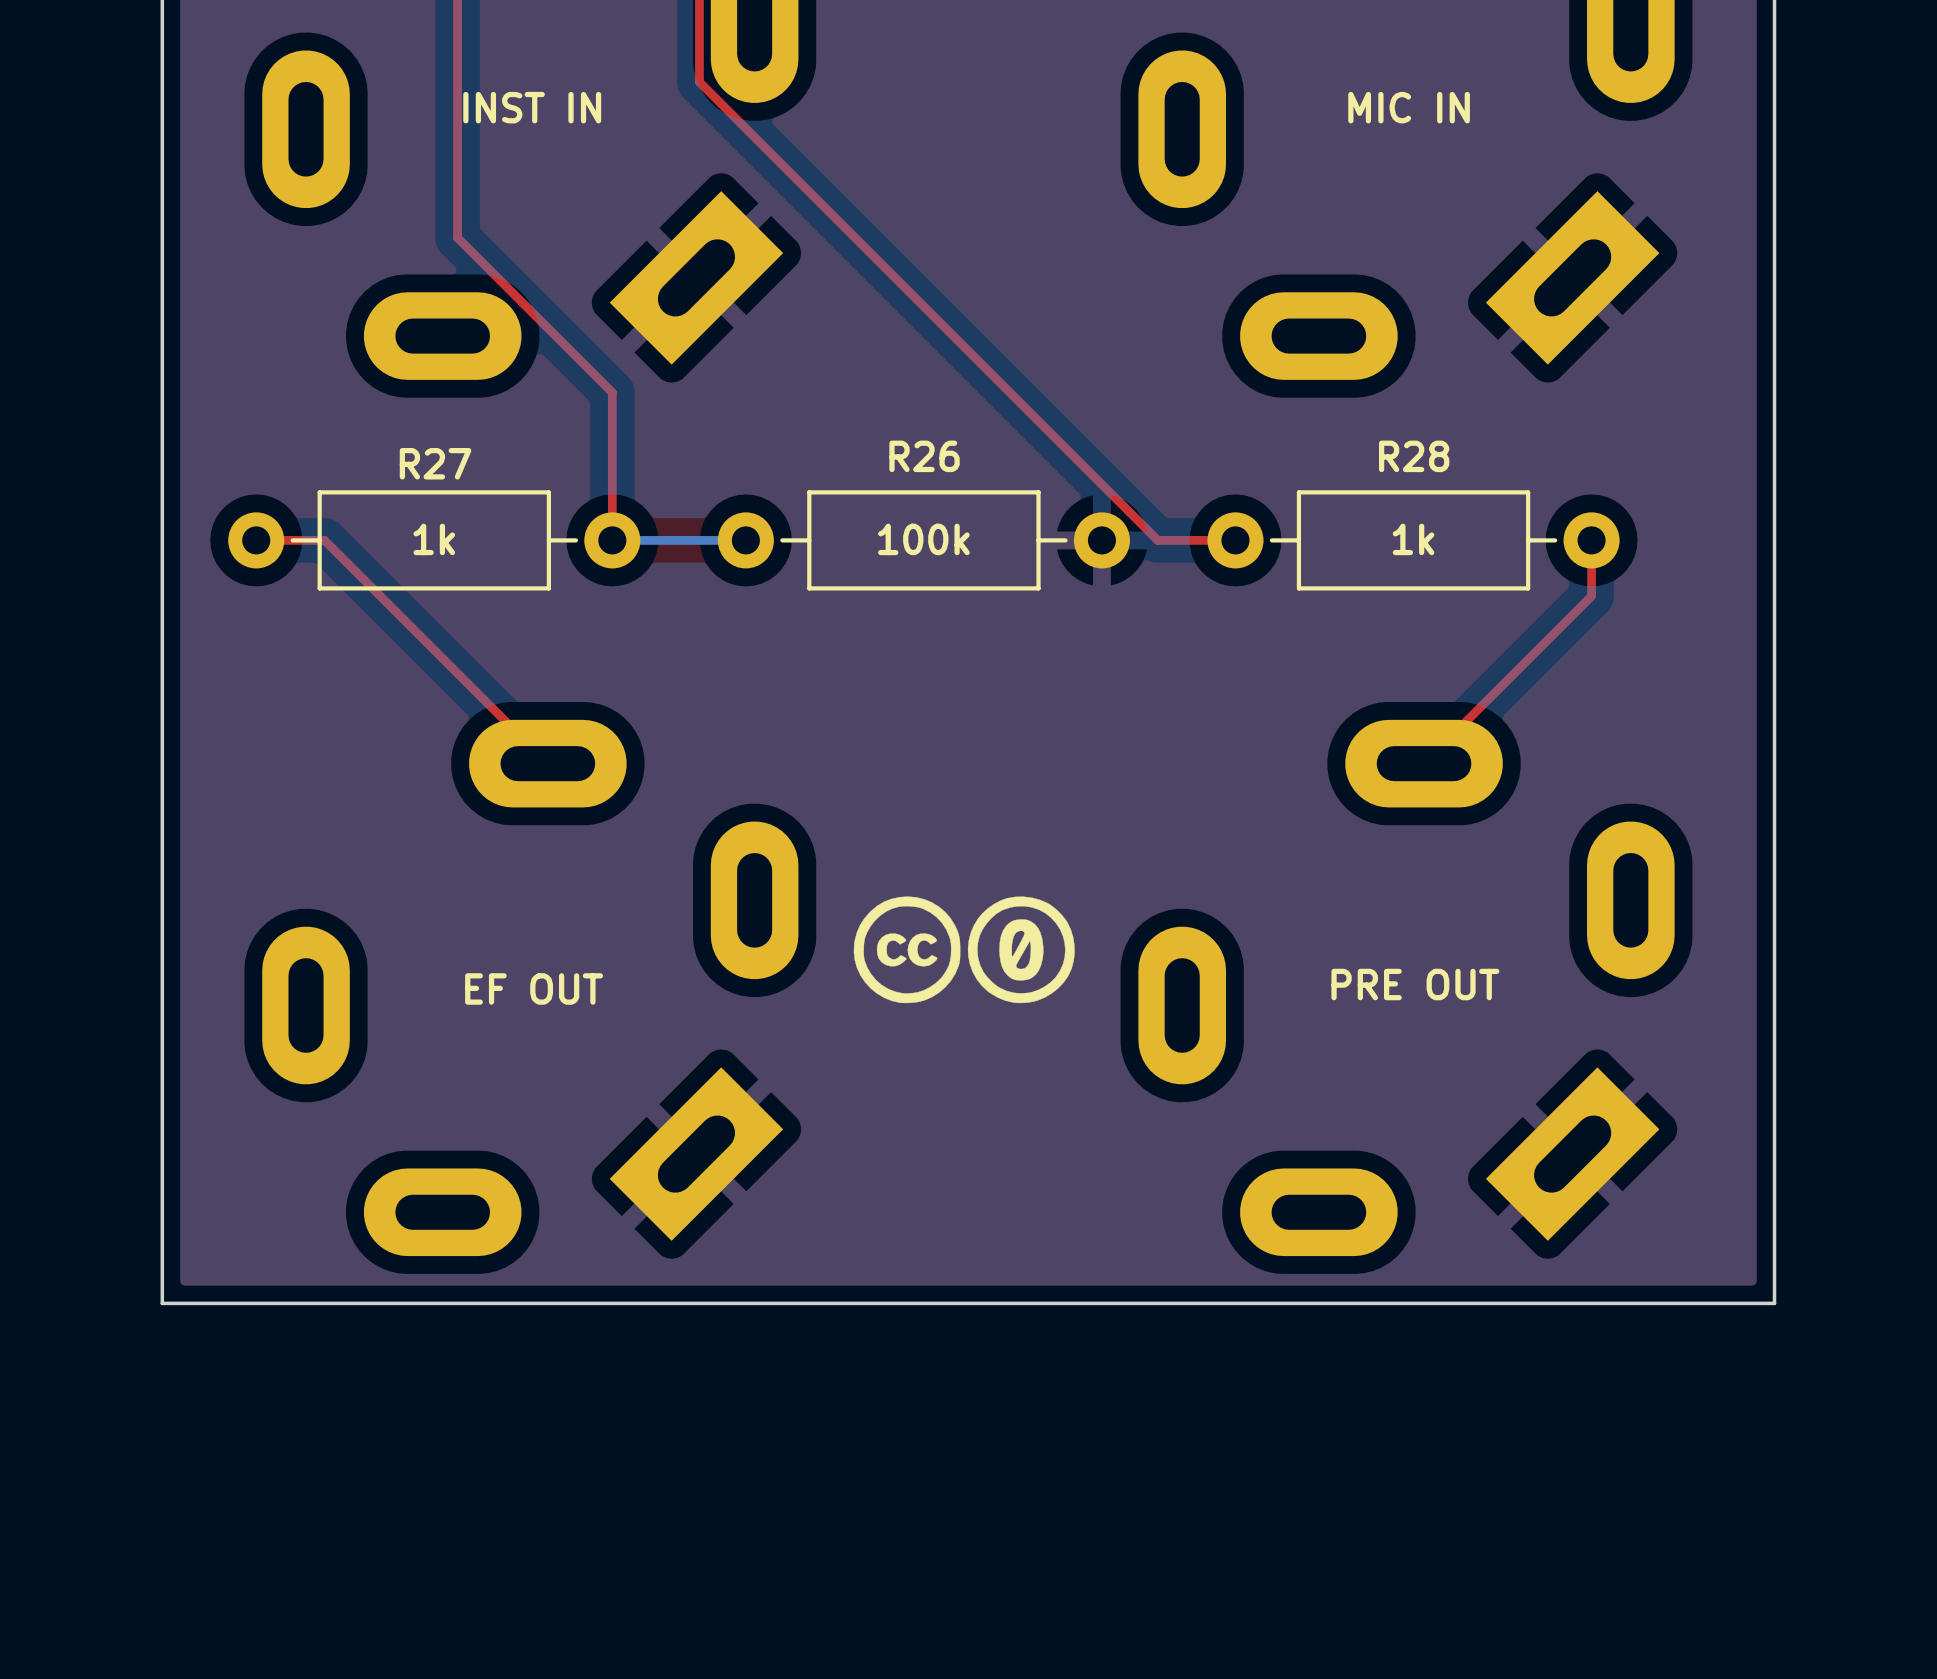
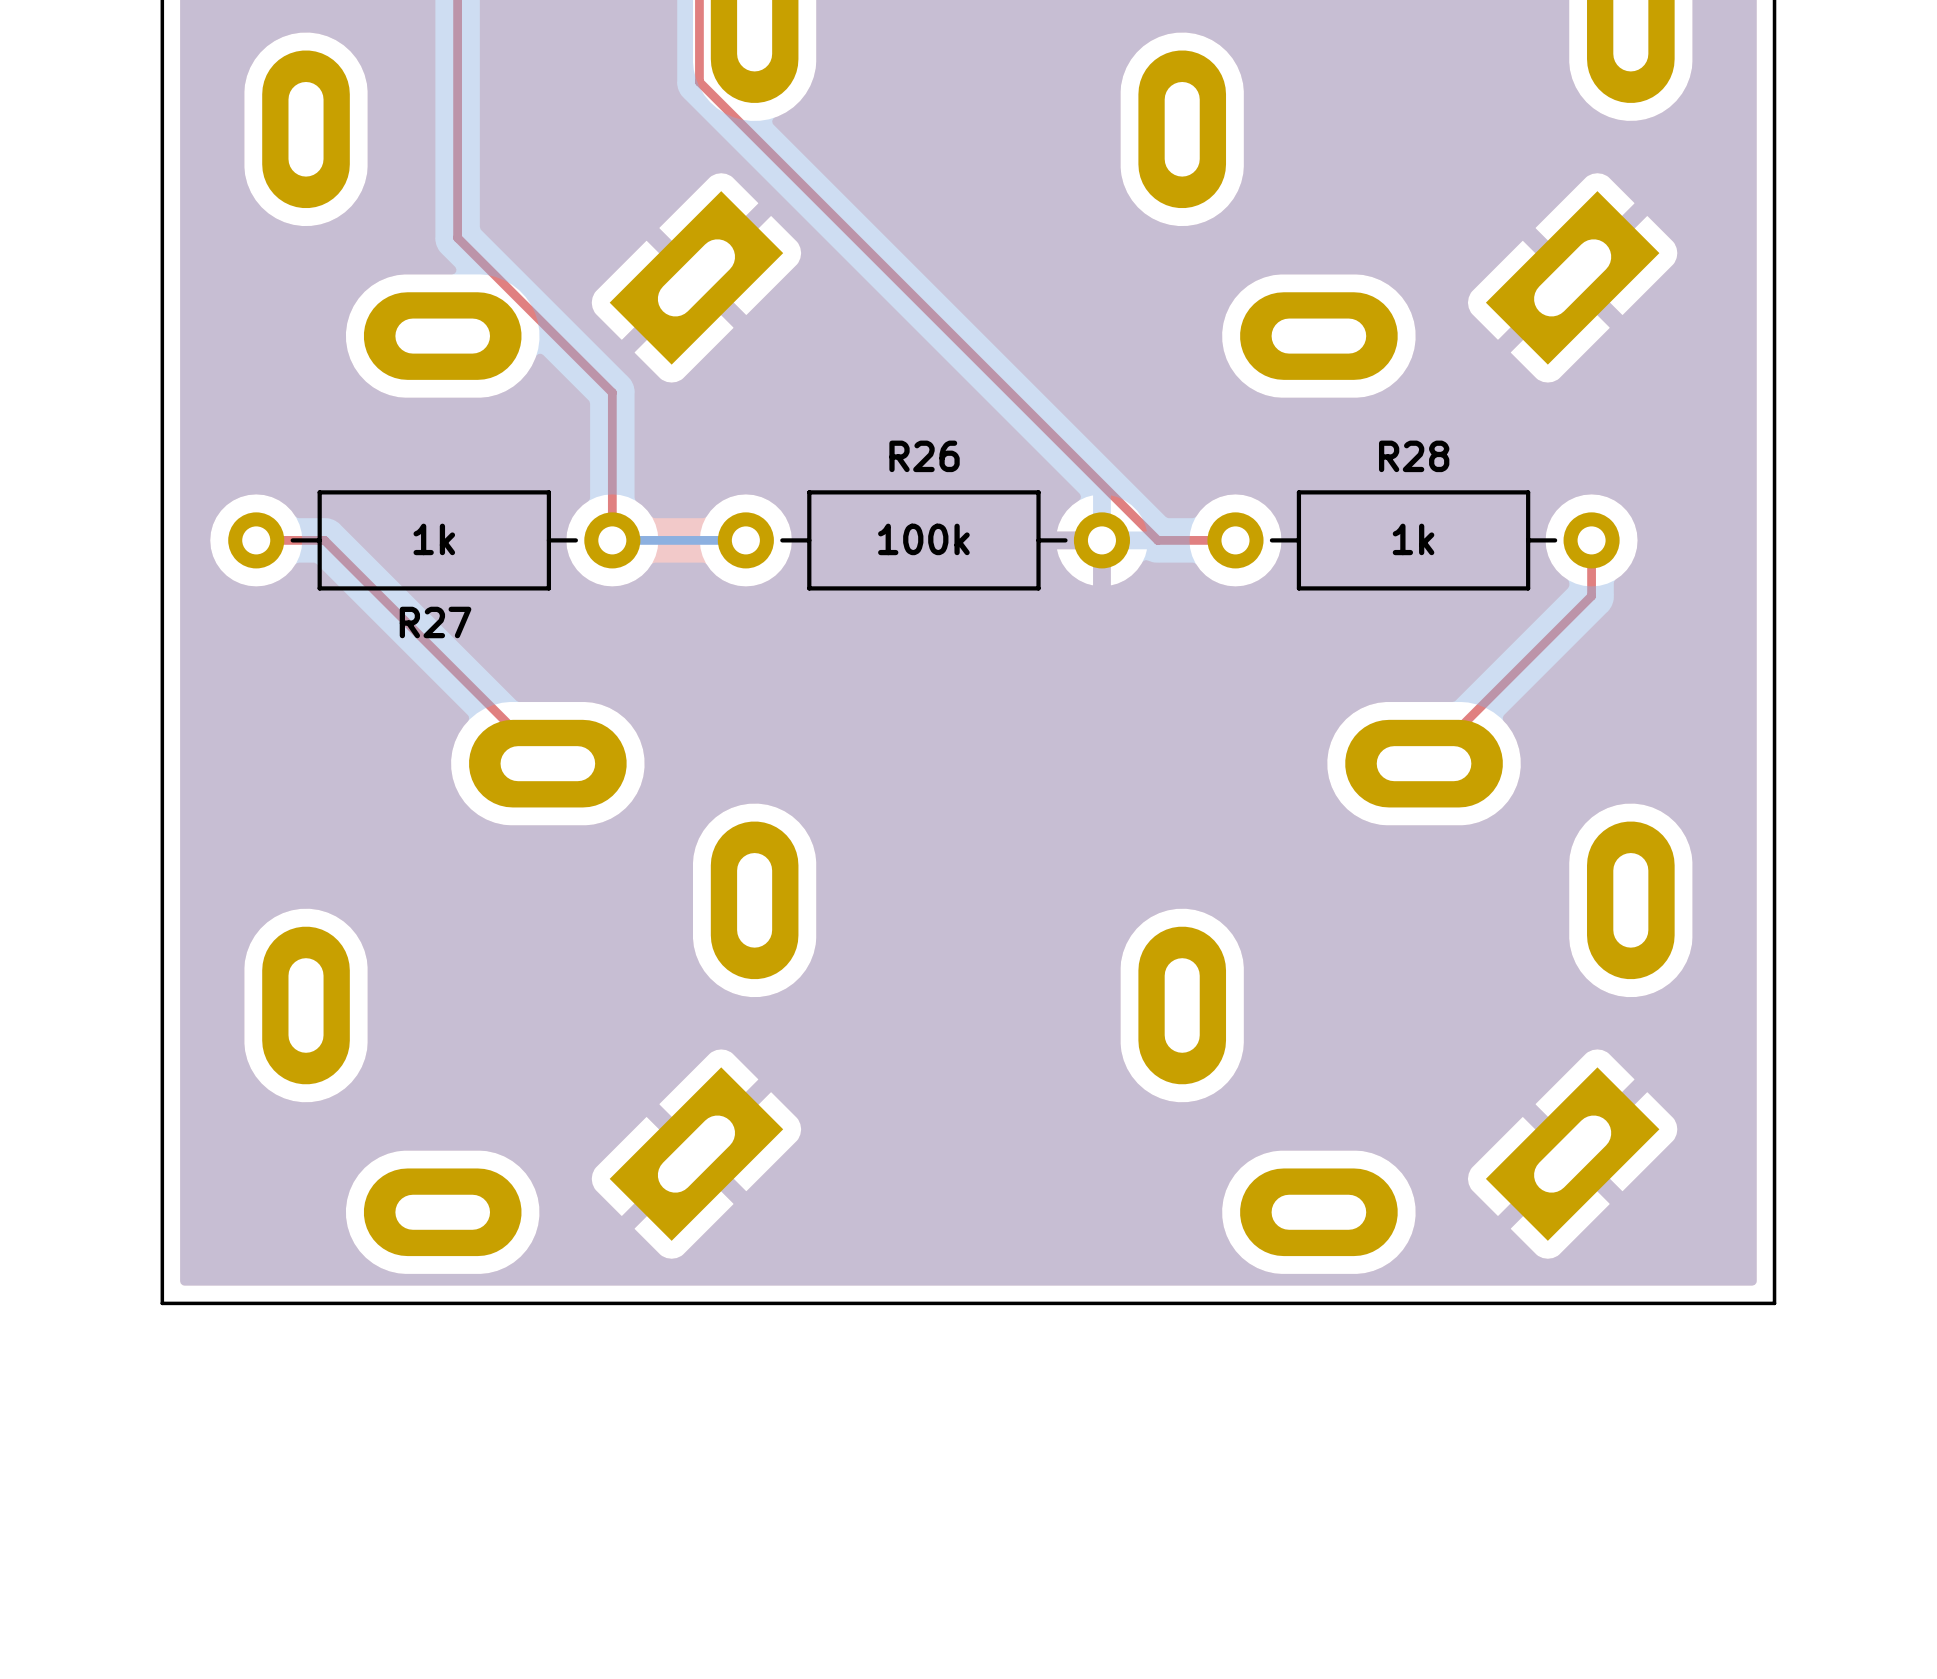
text: INST IN (532, 107) -> none
text: MIC IN (1409, 107) -> none
R27 name position: R27 (435, 463) -> R27 (435, 622)
drawing: [853, 896, 1075, 1004] -> none
text: PRE OUT (1415, 984) -> none
text: EF OUT (534, 988) -> none

